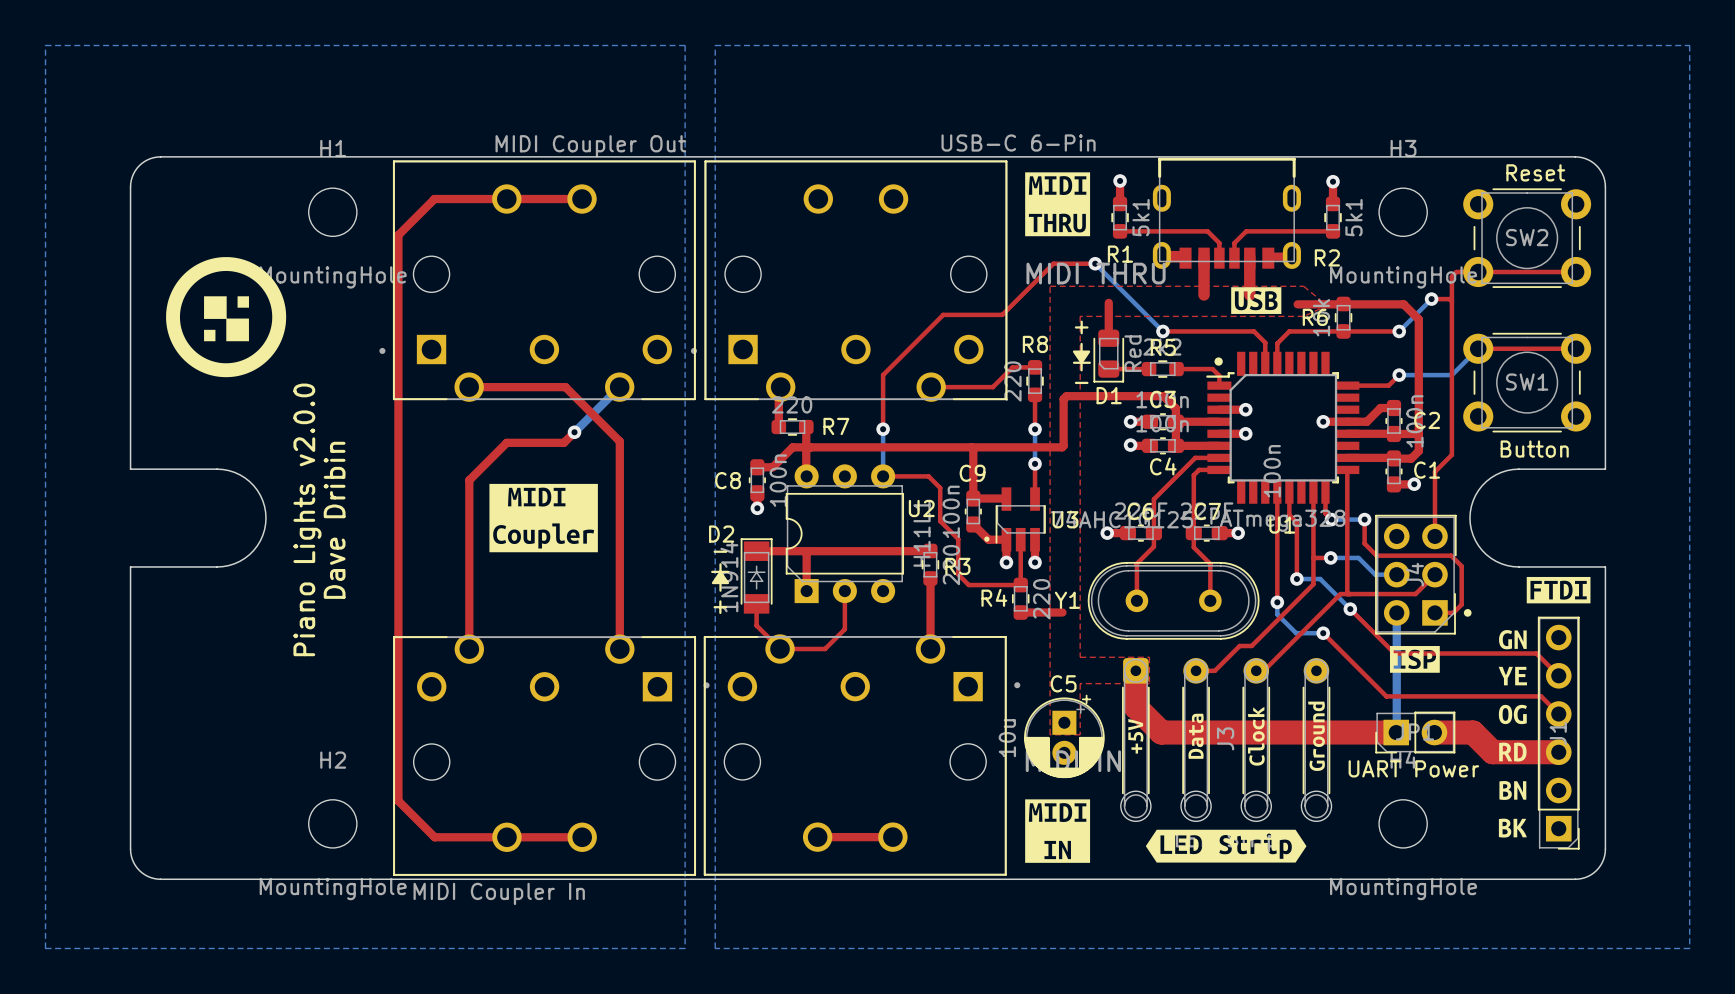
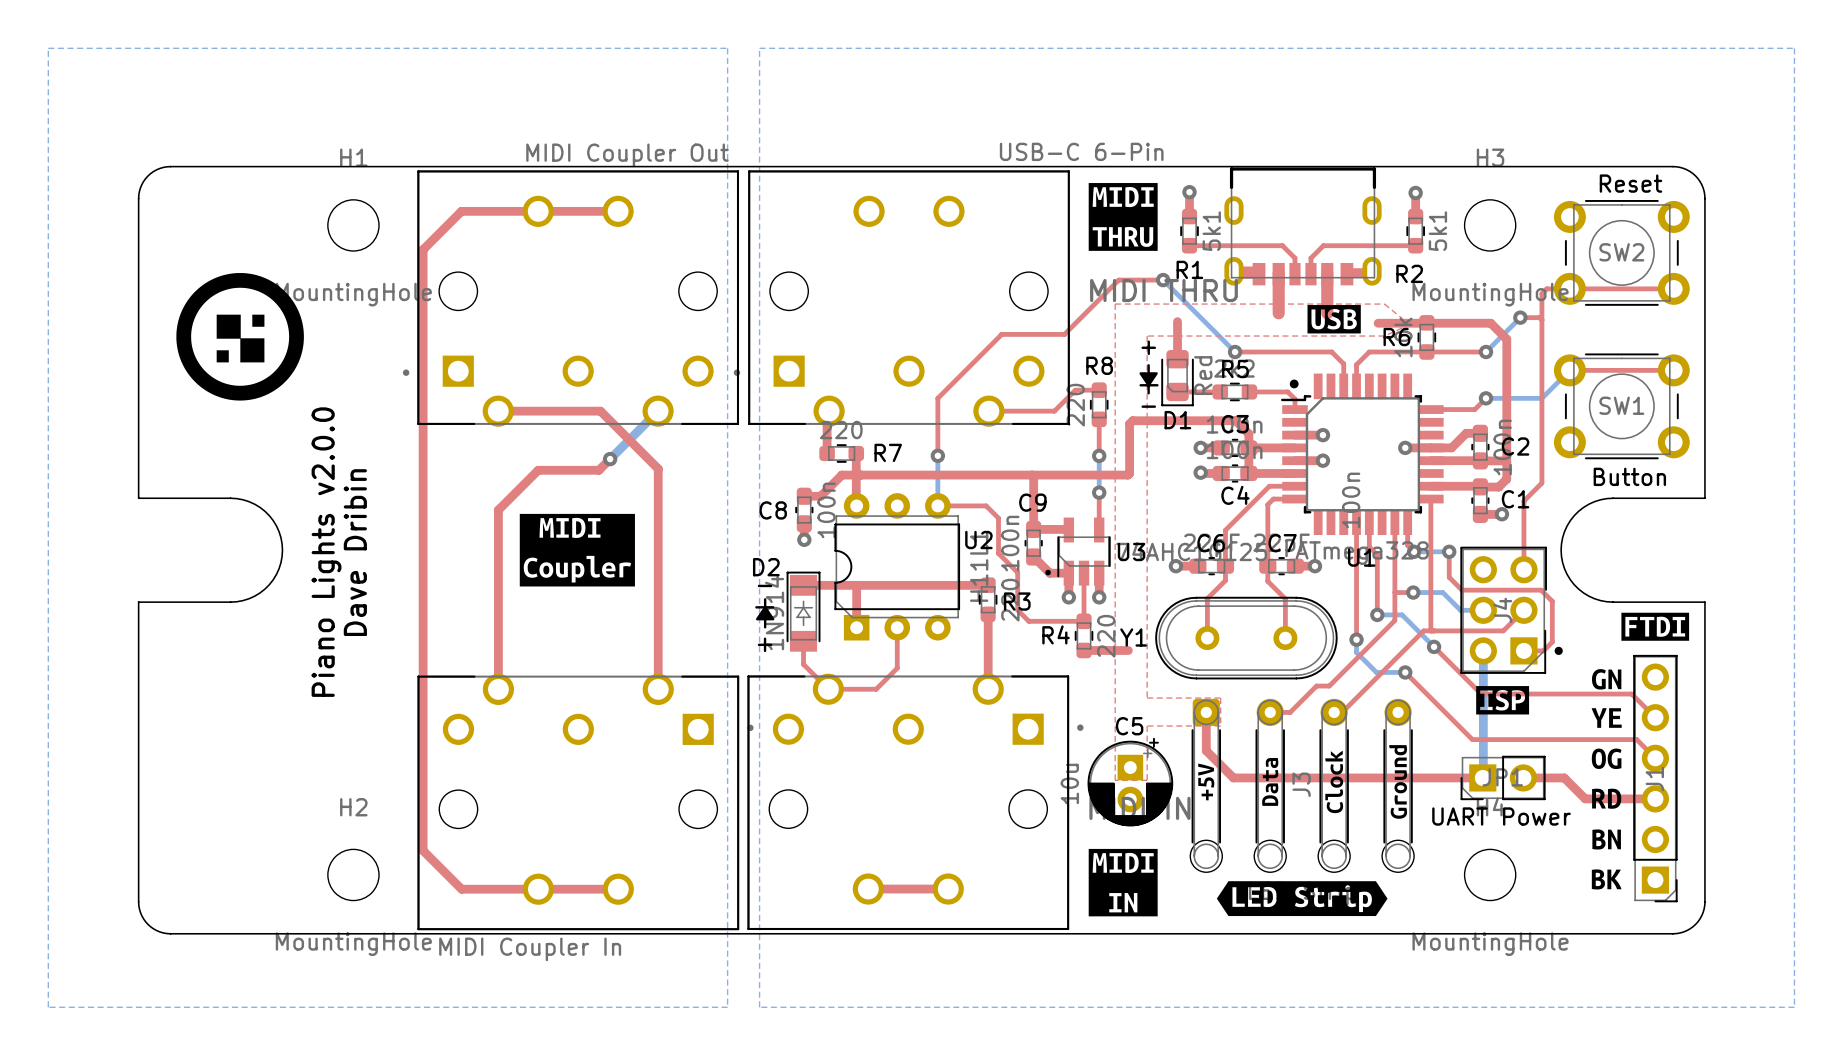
top track width: thick (1135, 670) (1135, 706) (1161, 732) (1396, 732) -> thin (1206, 712) (1206, 750) (1233, 777) (1482, 777)
top track width: thick (1434, 732) (1472, 732) (1492, 752) (1558, 752) -> thin (1523, 777) (1564, 777) (1585, 798) (1655, 798)

